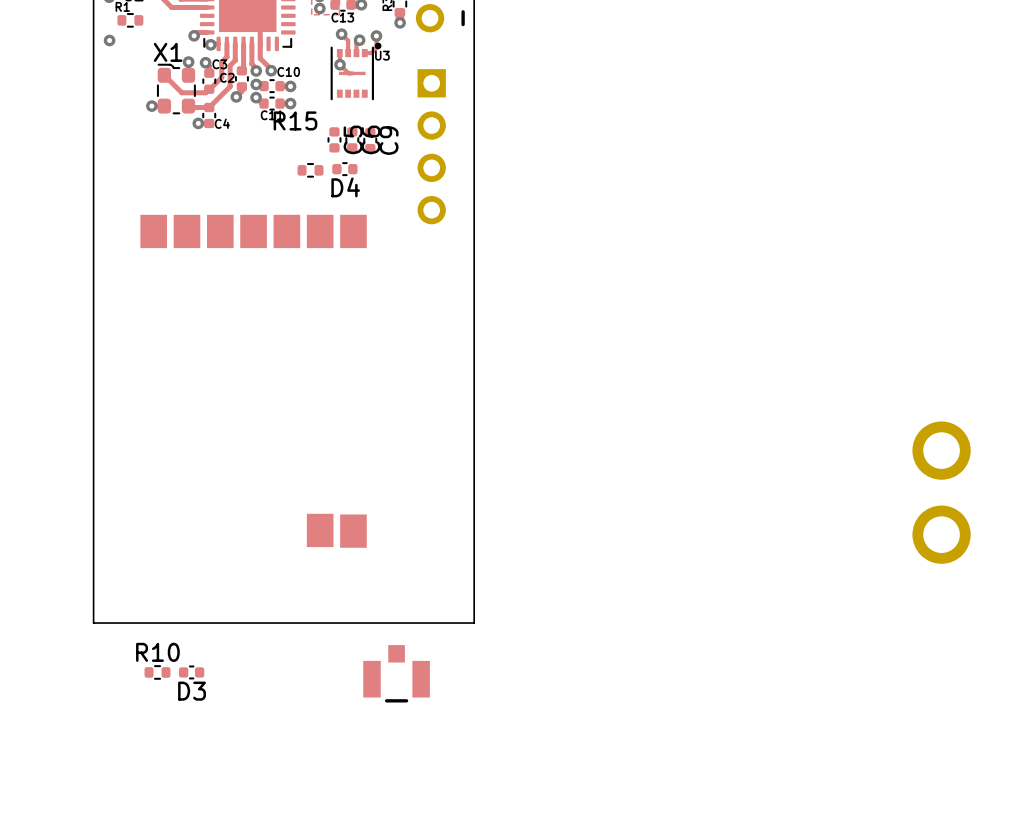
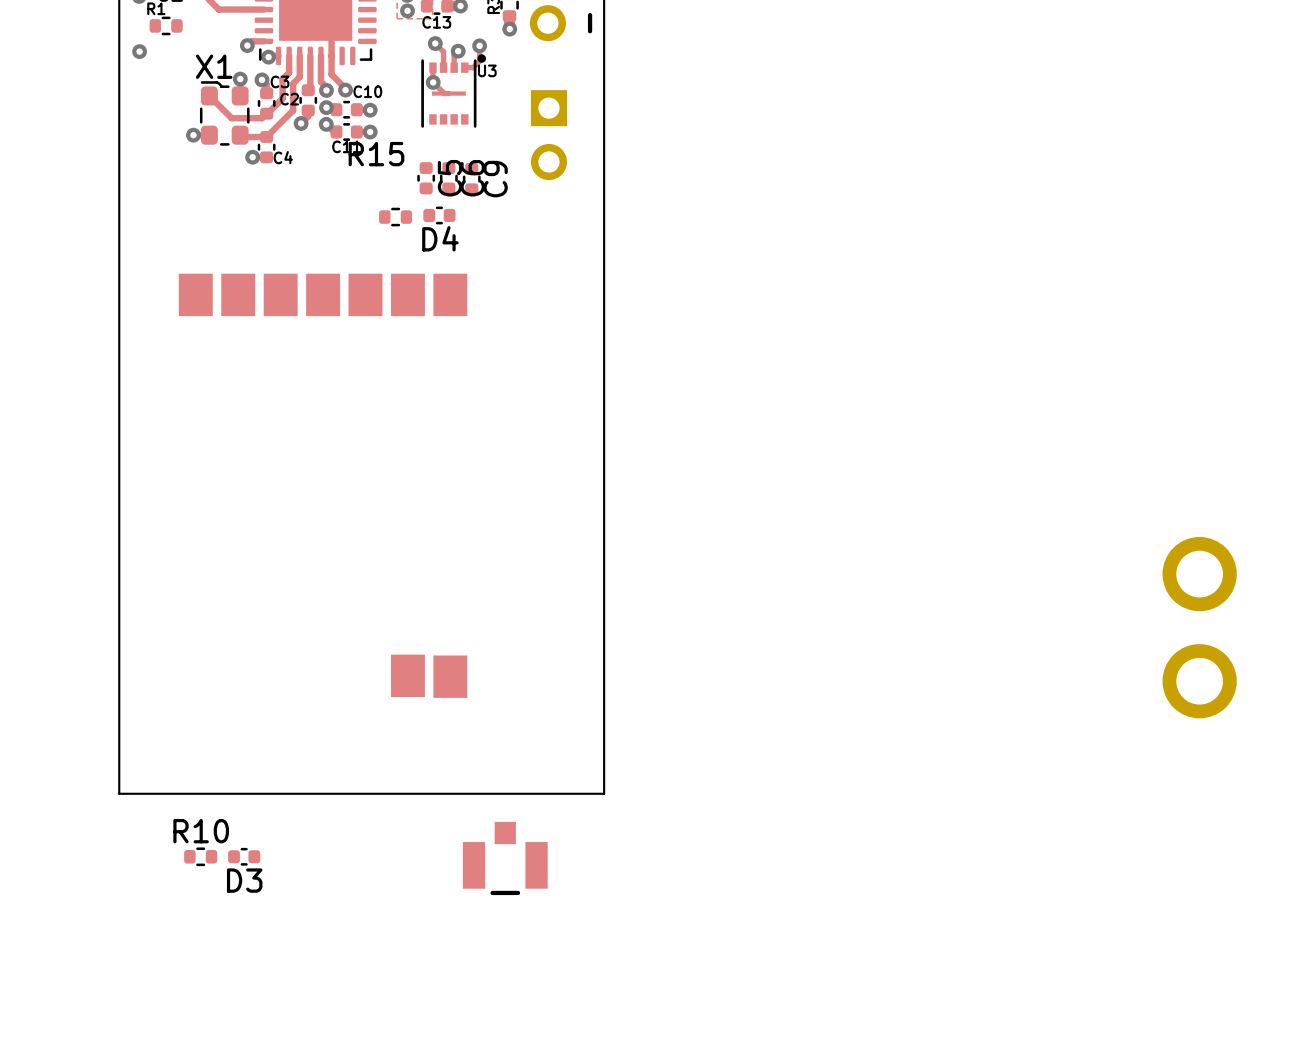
part: none -> (548, 135)
part: (431, 146) -> none

